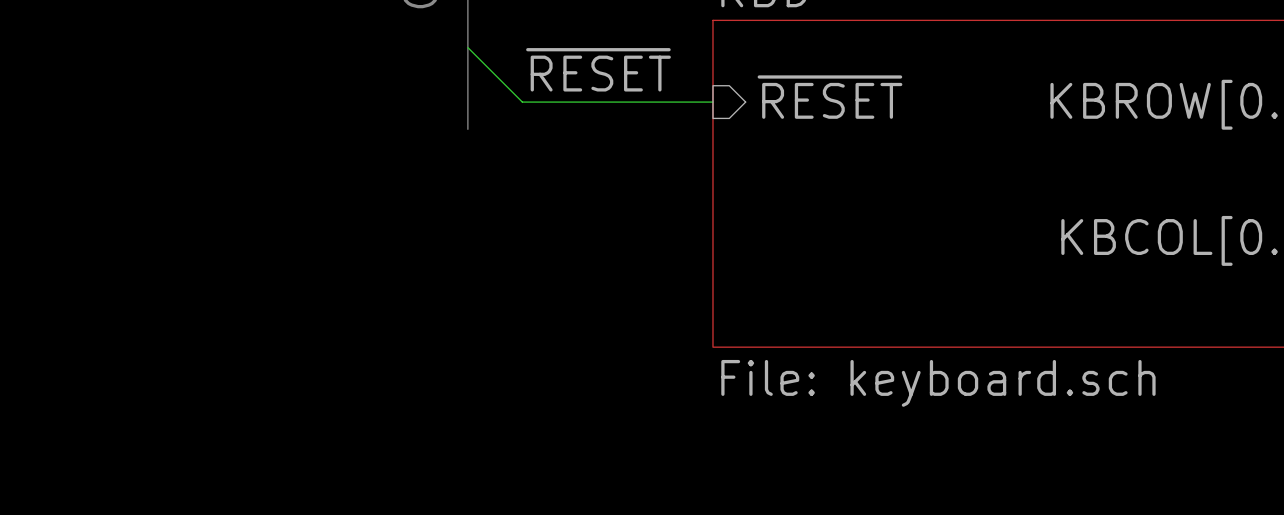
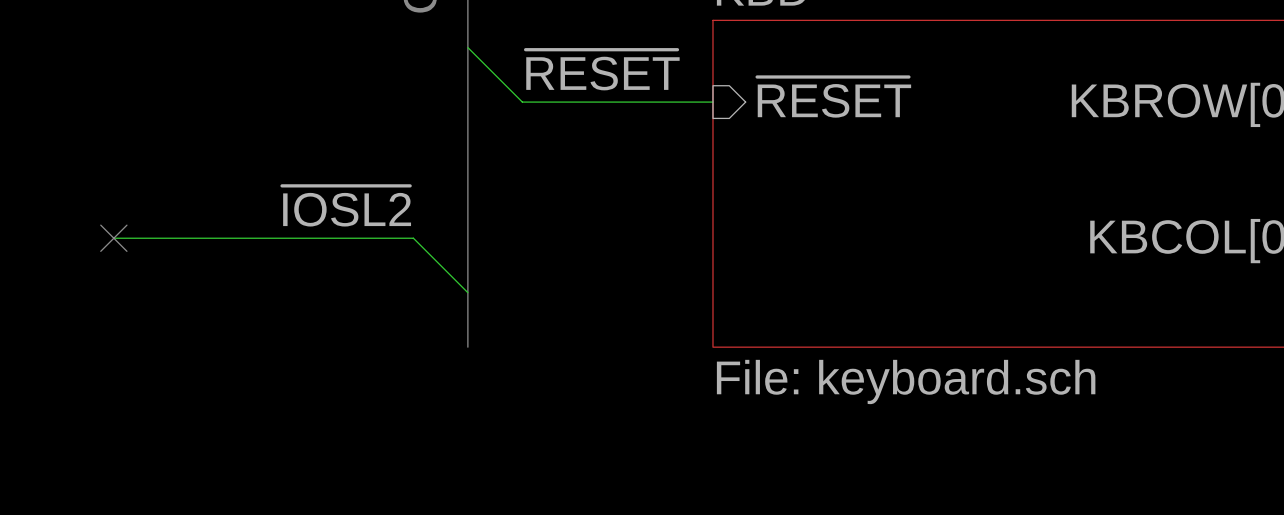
bus: none -> (467, 129) (467, 347)
label: none -> ~{IOSL2} (346, 206)
wire: none -> (113, 238) (413, 238) (467, 292)
no-connect mark: none -> (113, 238)

